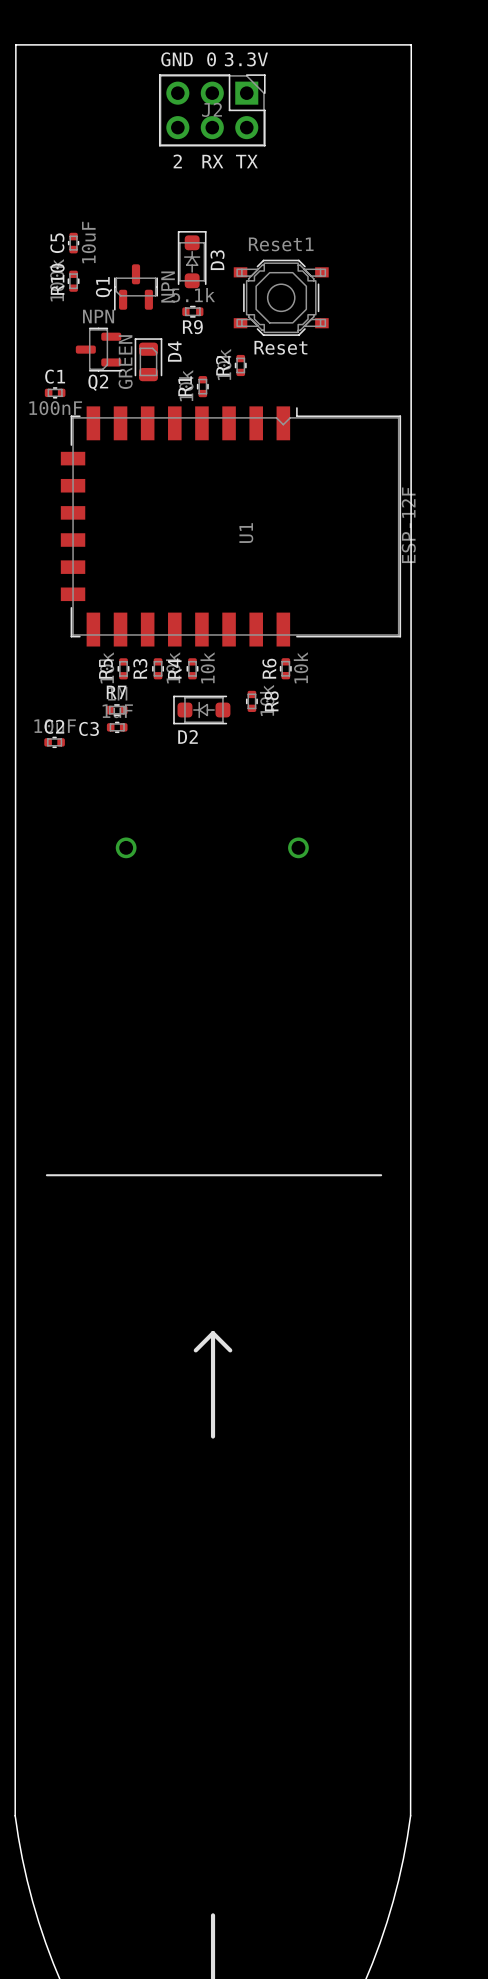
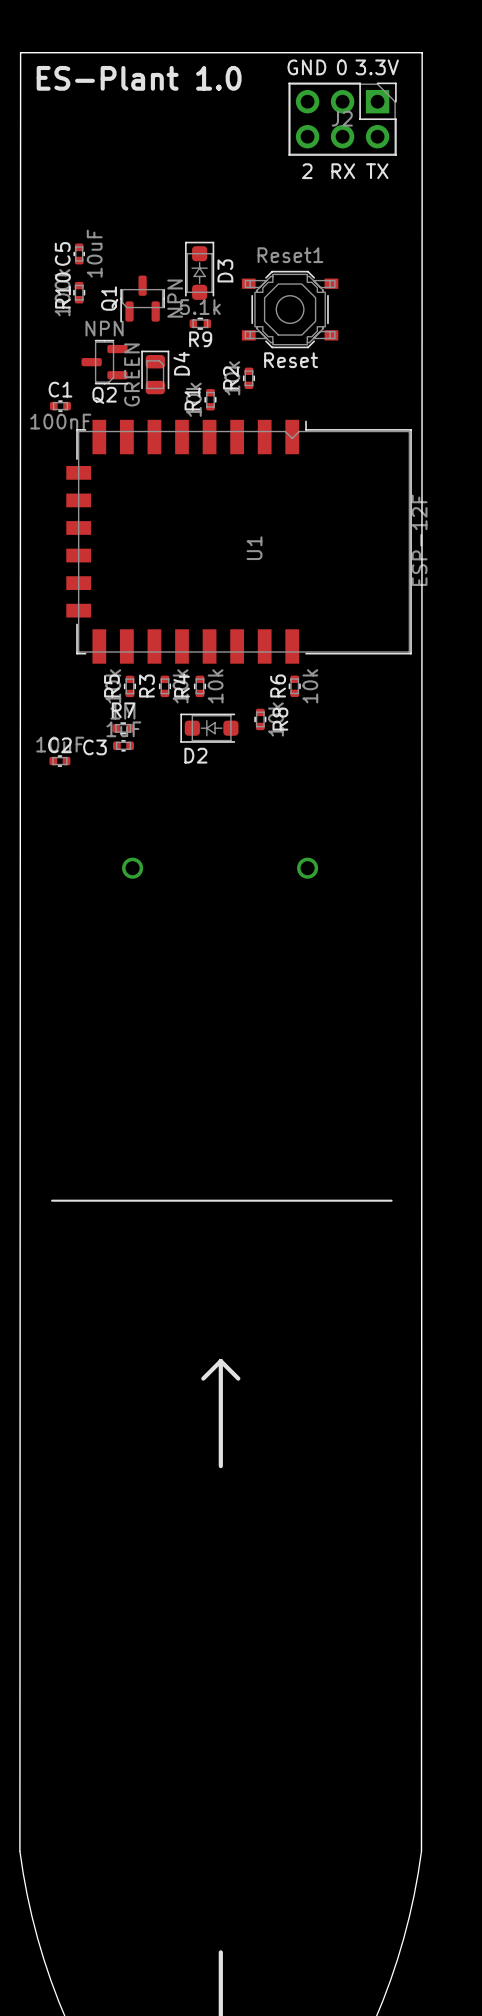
text position: GND (177, 59) -> GND (306, 67)
text position: 0 (211, 59) -> 0 (341, 67)
text position: 3.3V (246, 59) -> 3.3V (377, 67)
text: none -> ES-Plant 1.0 (139, 78)
J2 position: (212, 110) -> (342, 119)
text position: 2 (177, 161) -> 2 (307, 171)
text position: RX (212, 161) -> RX (343, 171)
text position: TX (246, 161) -> TX (377, 171)

